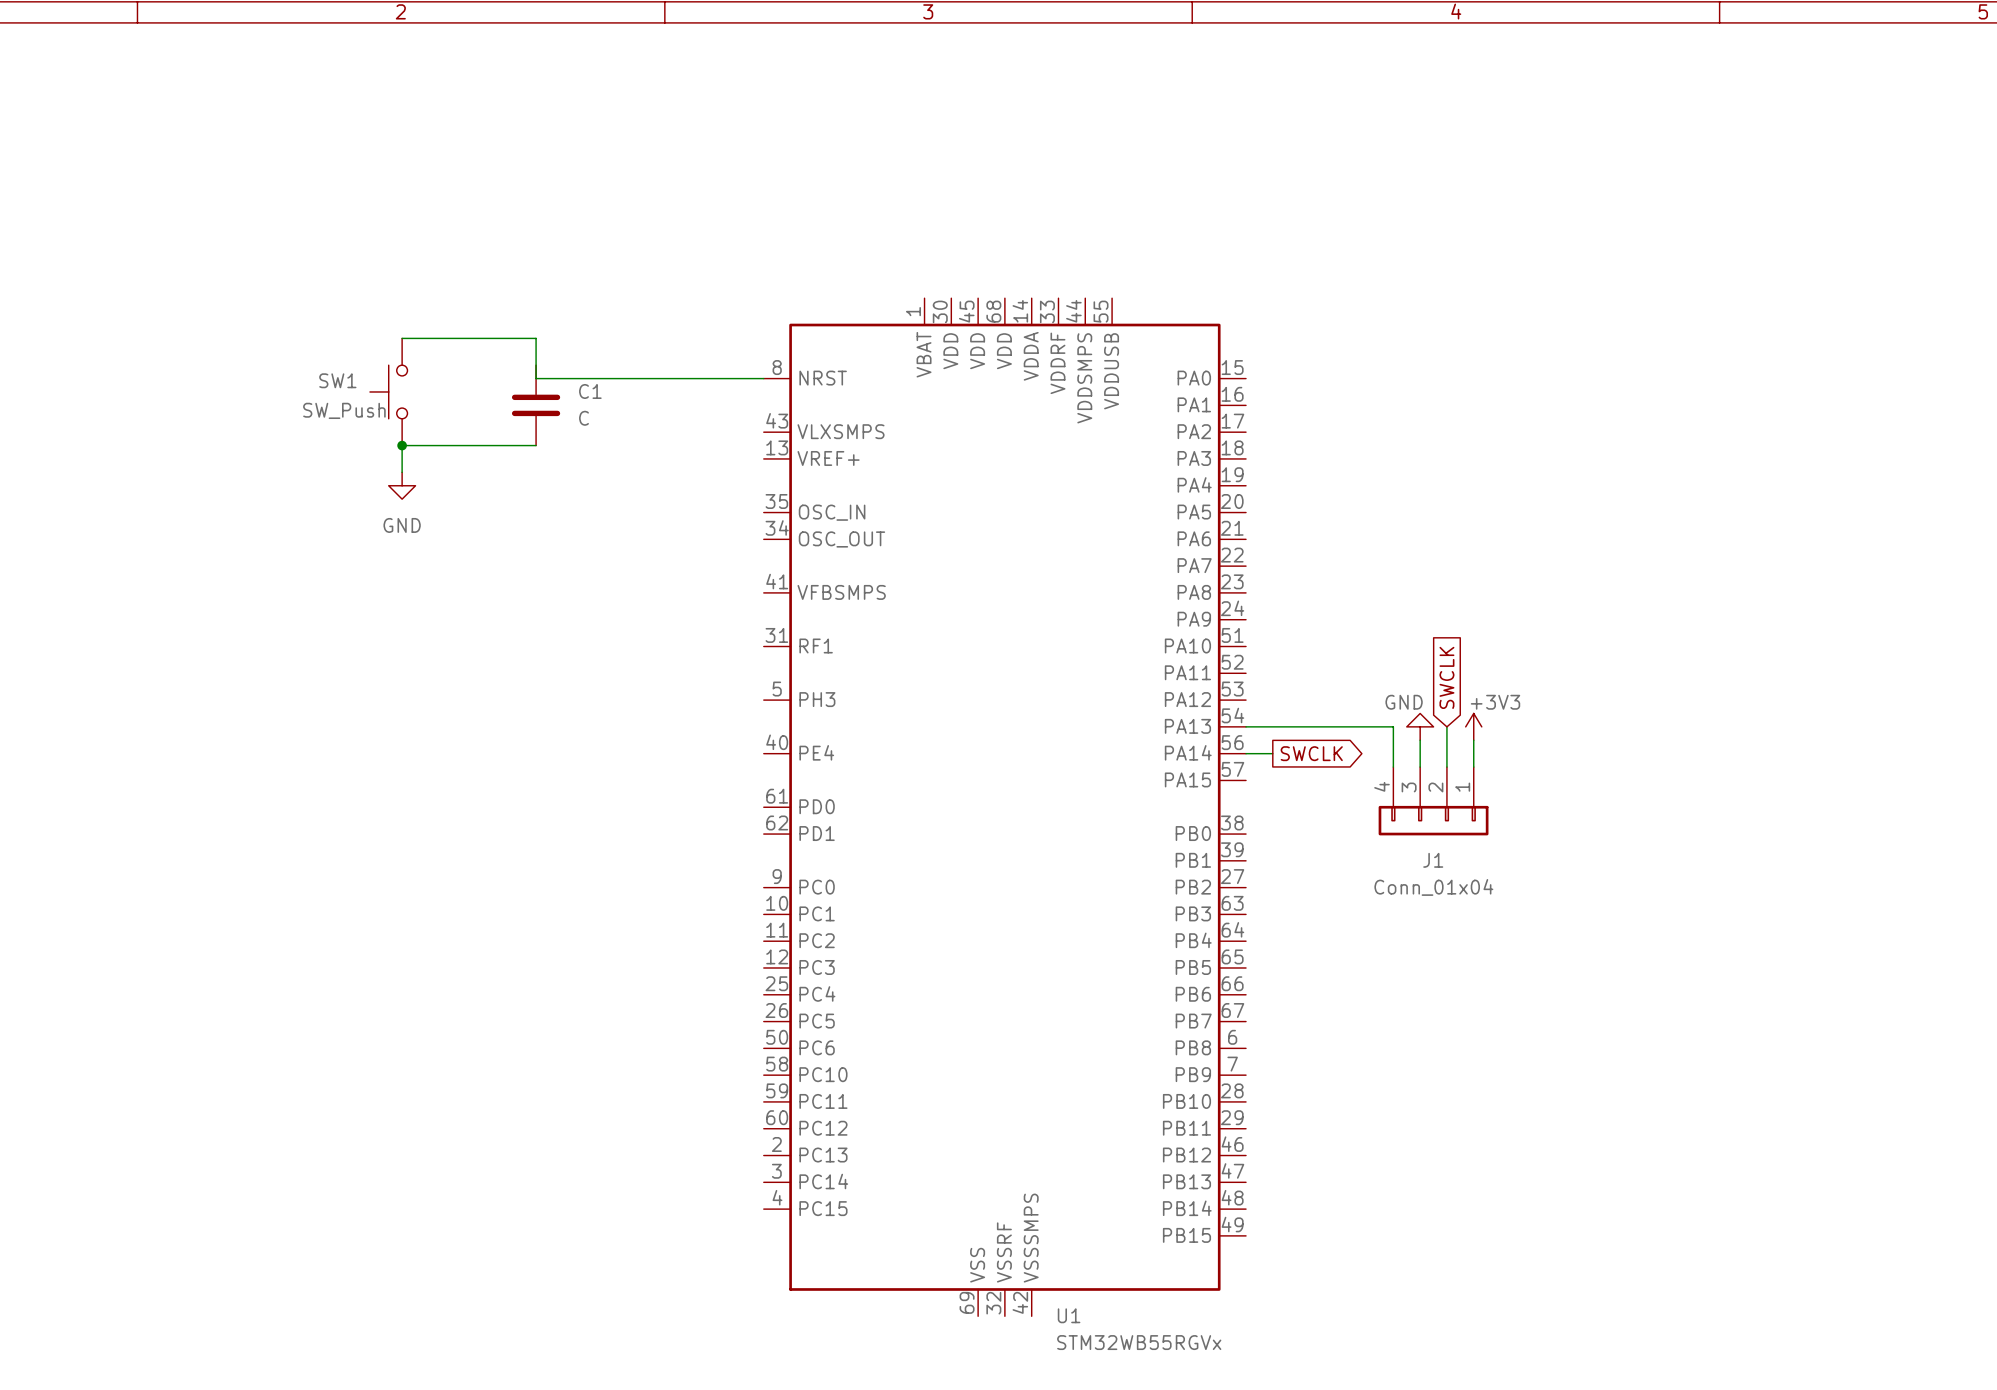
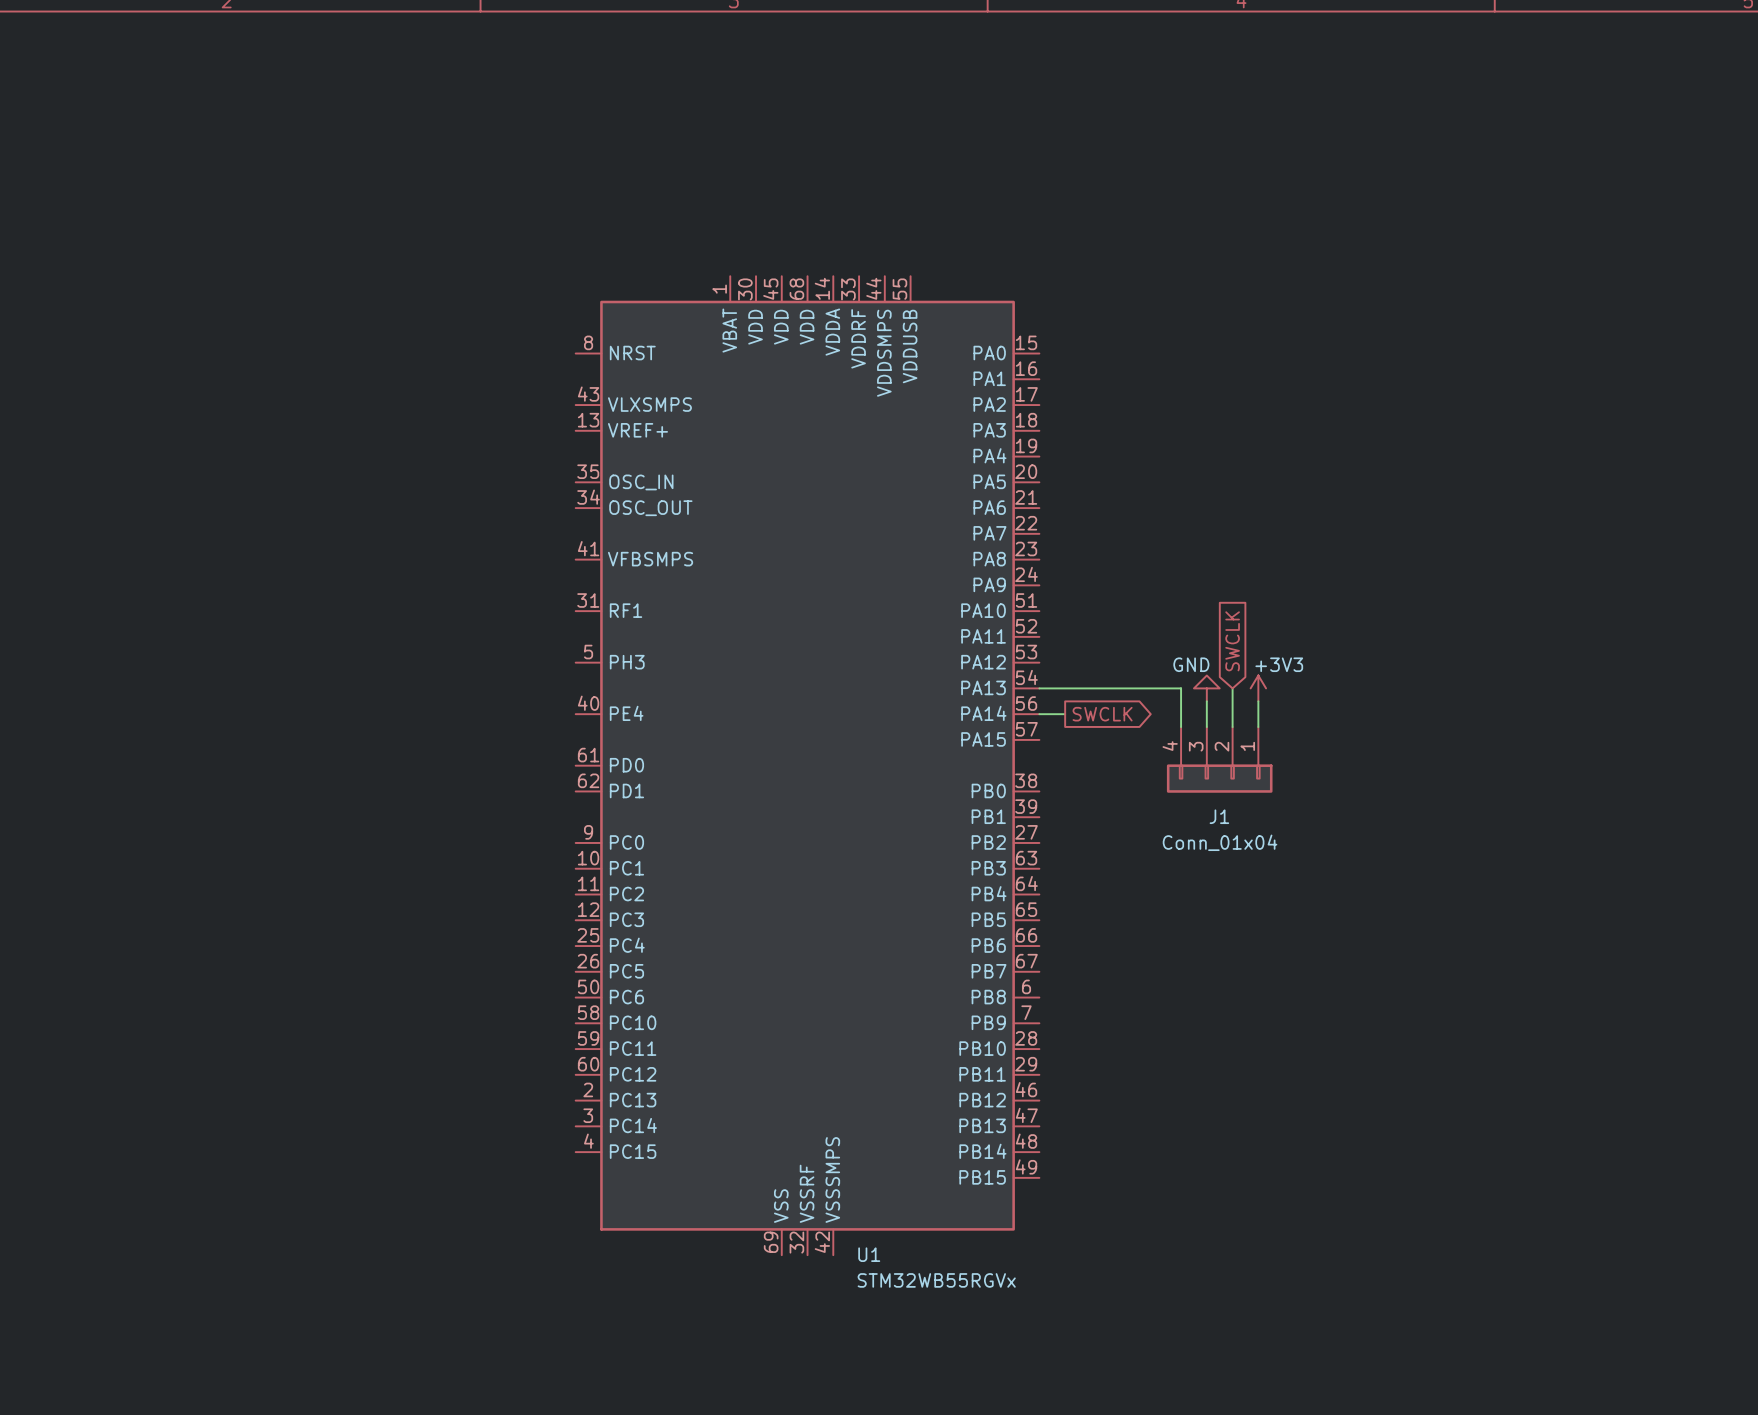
wire: (402, 338) (536, 338) (536, 378) (763, 378) -> none
SW1: SW_Push (388, 391) -> none
C1: C (536, 405) -> none
junction: (402, 445) -> none
wire: (536, 445) (402, 445) (402, 472) -> none
power symbol: GND (402, 485) -> none

